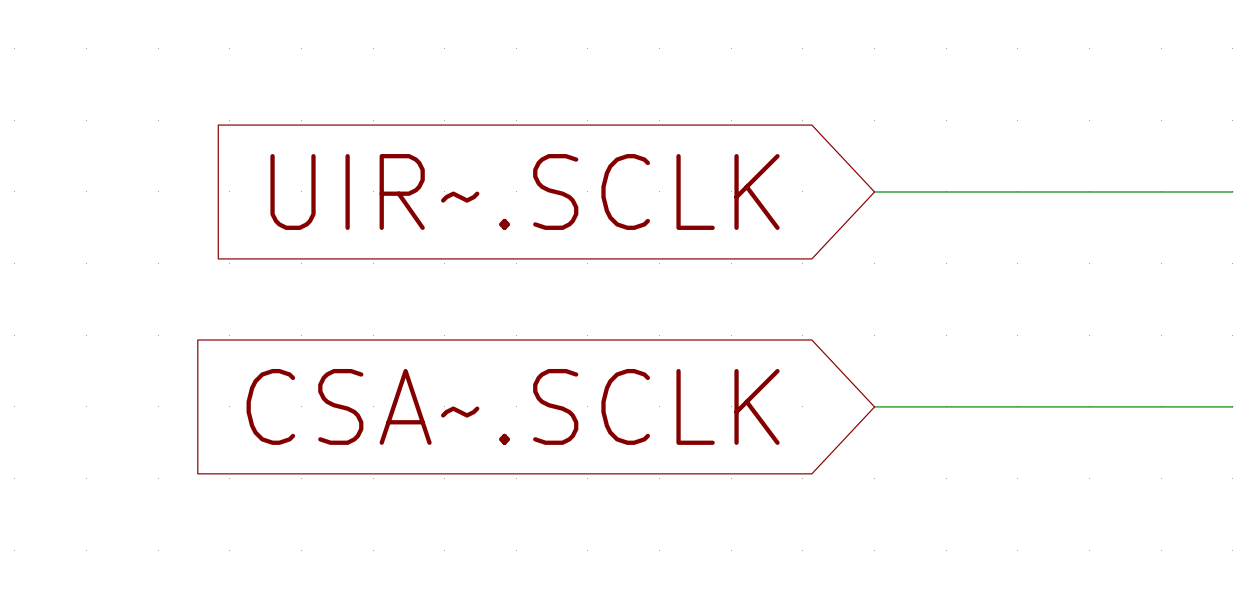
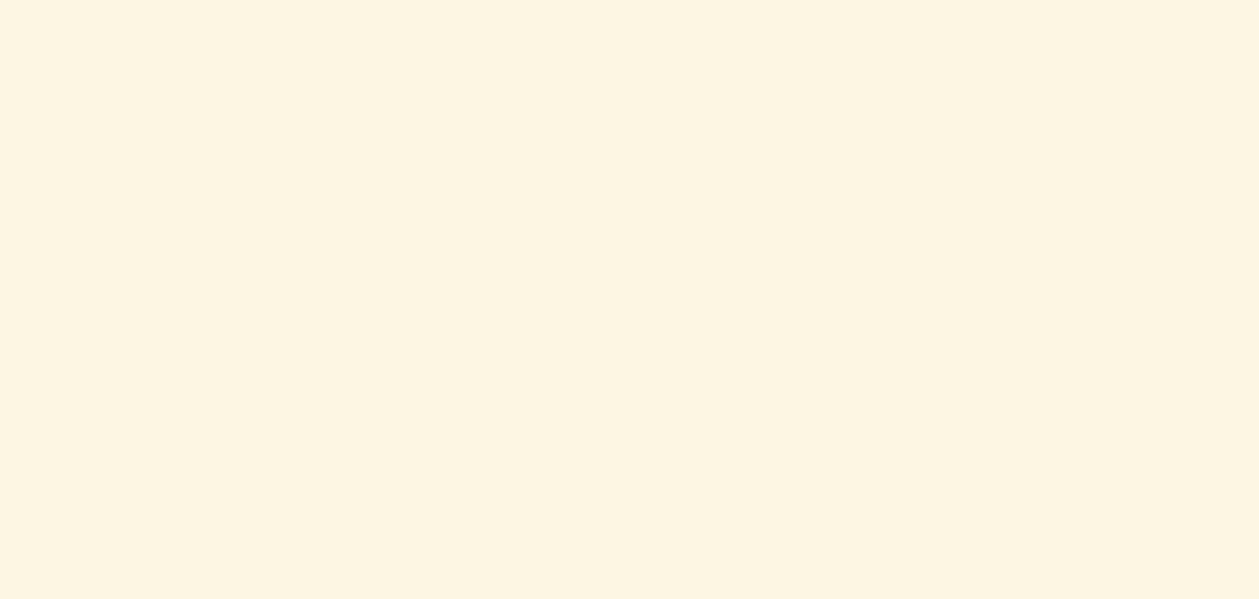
global label: UIR~.SCLK (525, 191) -> none
wire: (874, 191) (1232, 191) -> none
global label: CSA~.SCLK (513, 406) -> none
wire: (874, 406) (1232, 406) -> none

